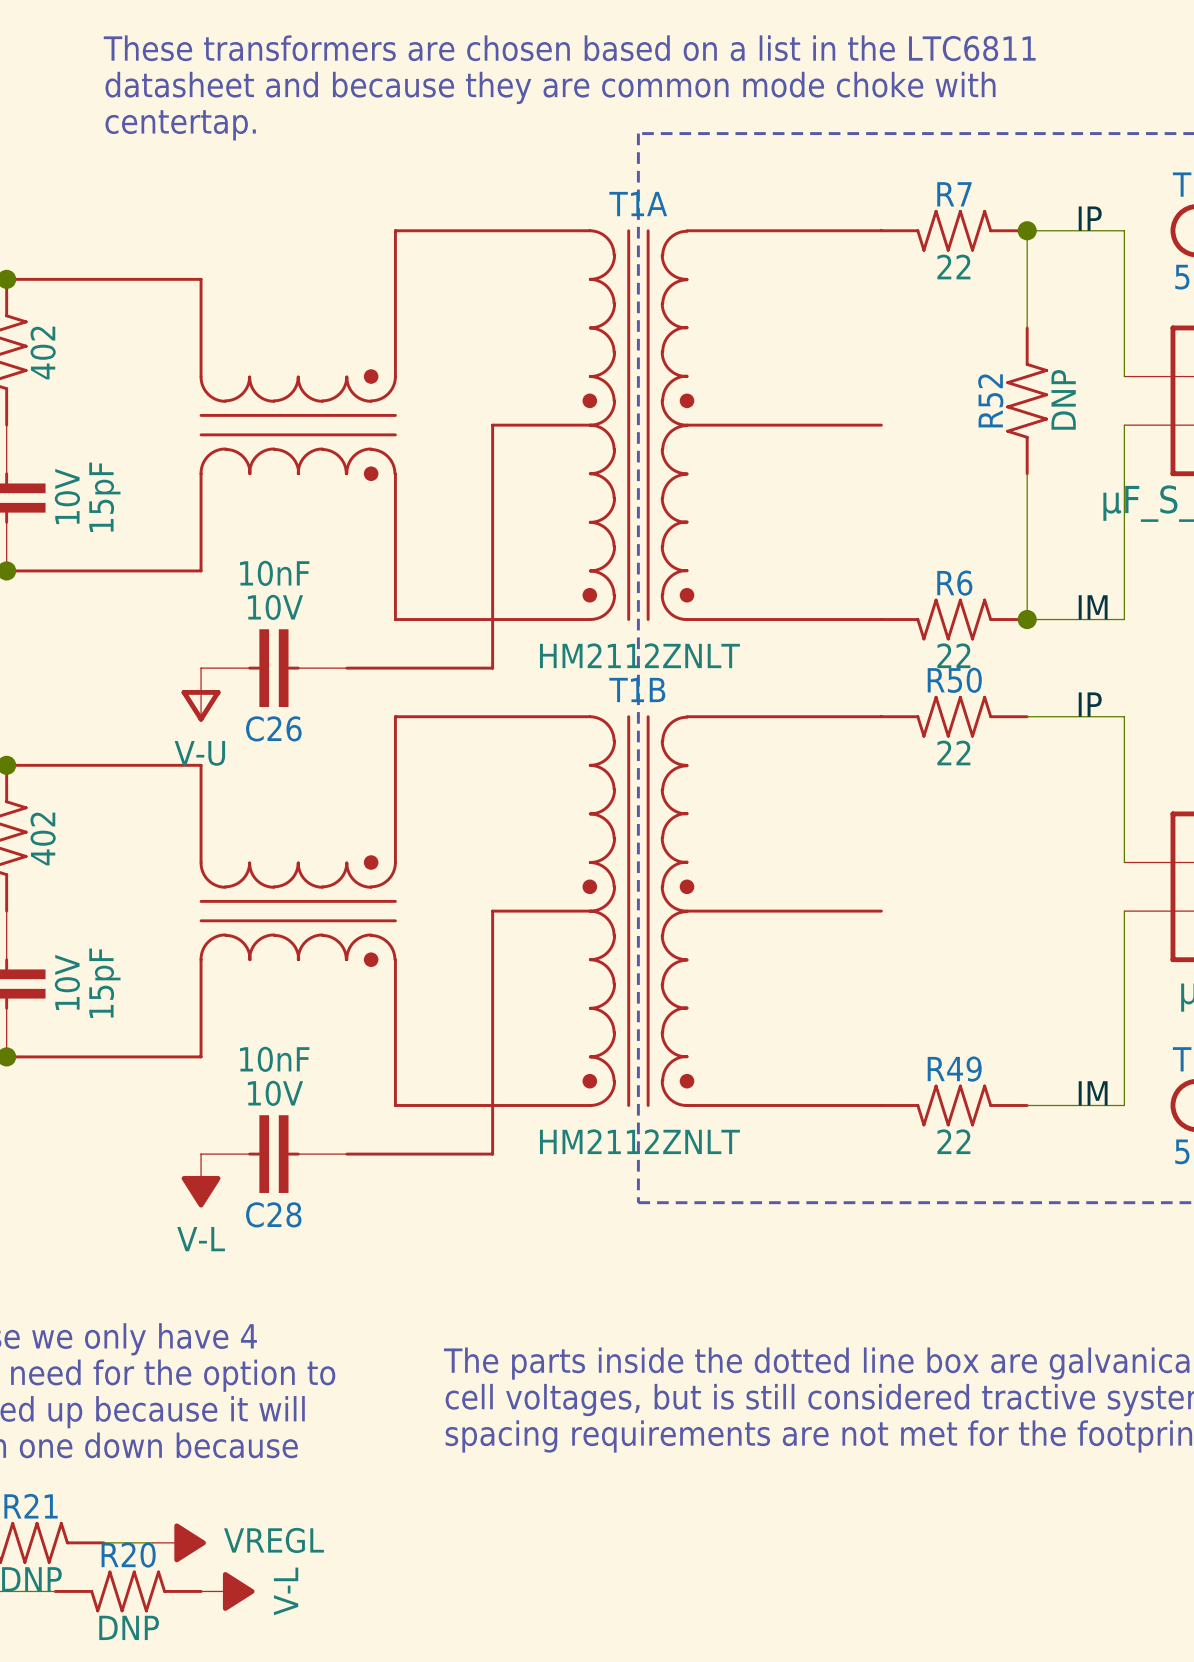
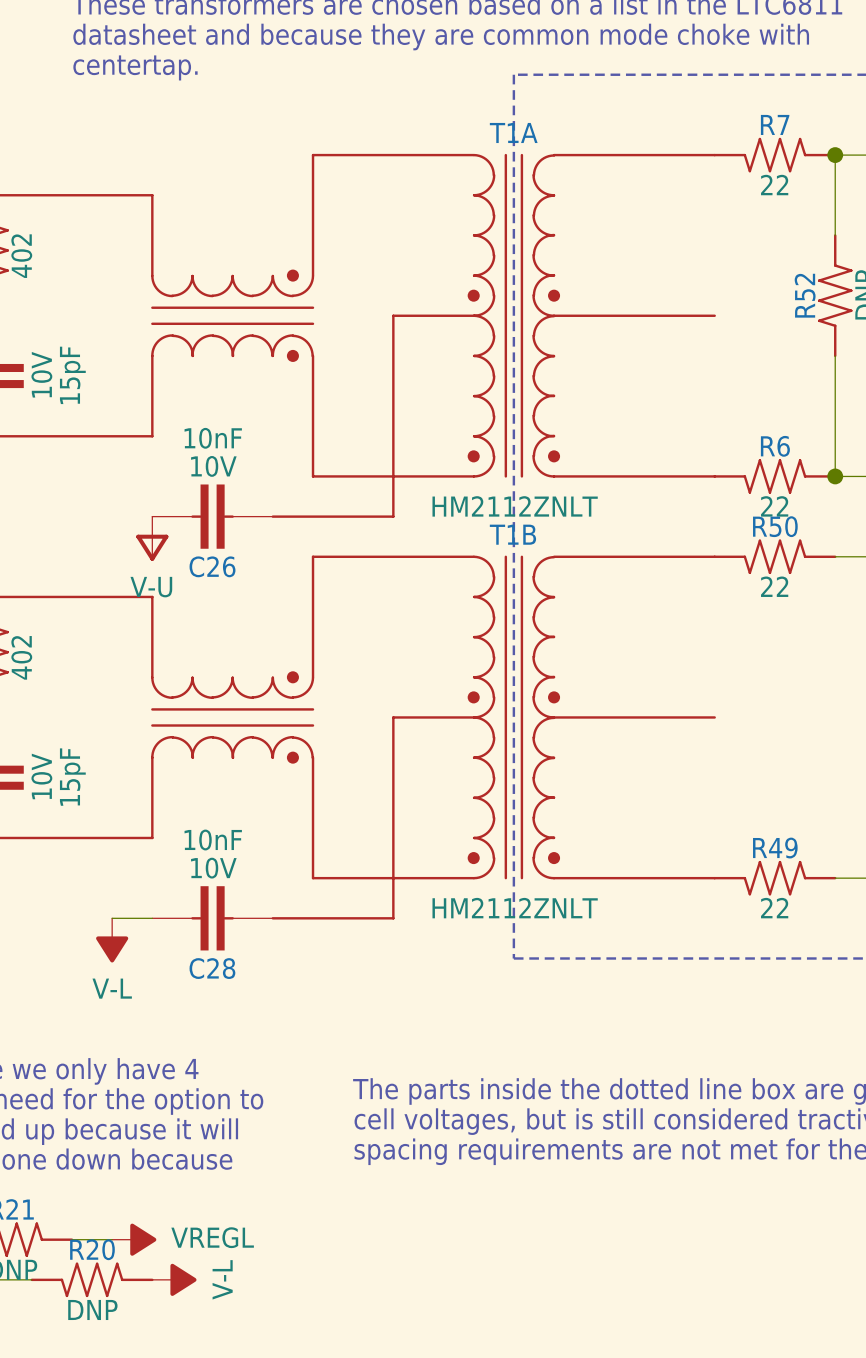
wire: none -> (112, 918) (152, 918)
power symbol position: V-L (201, 1180) -> V-L (112, 940)

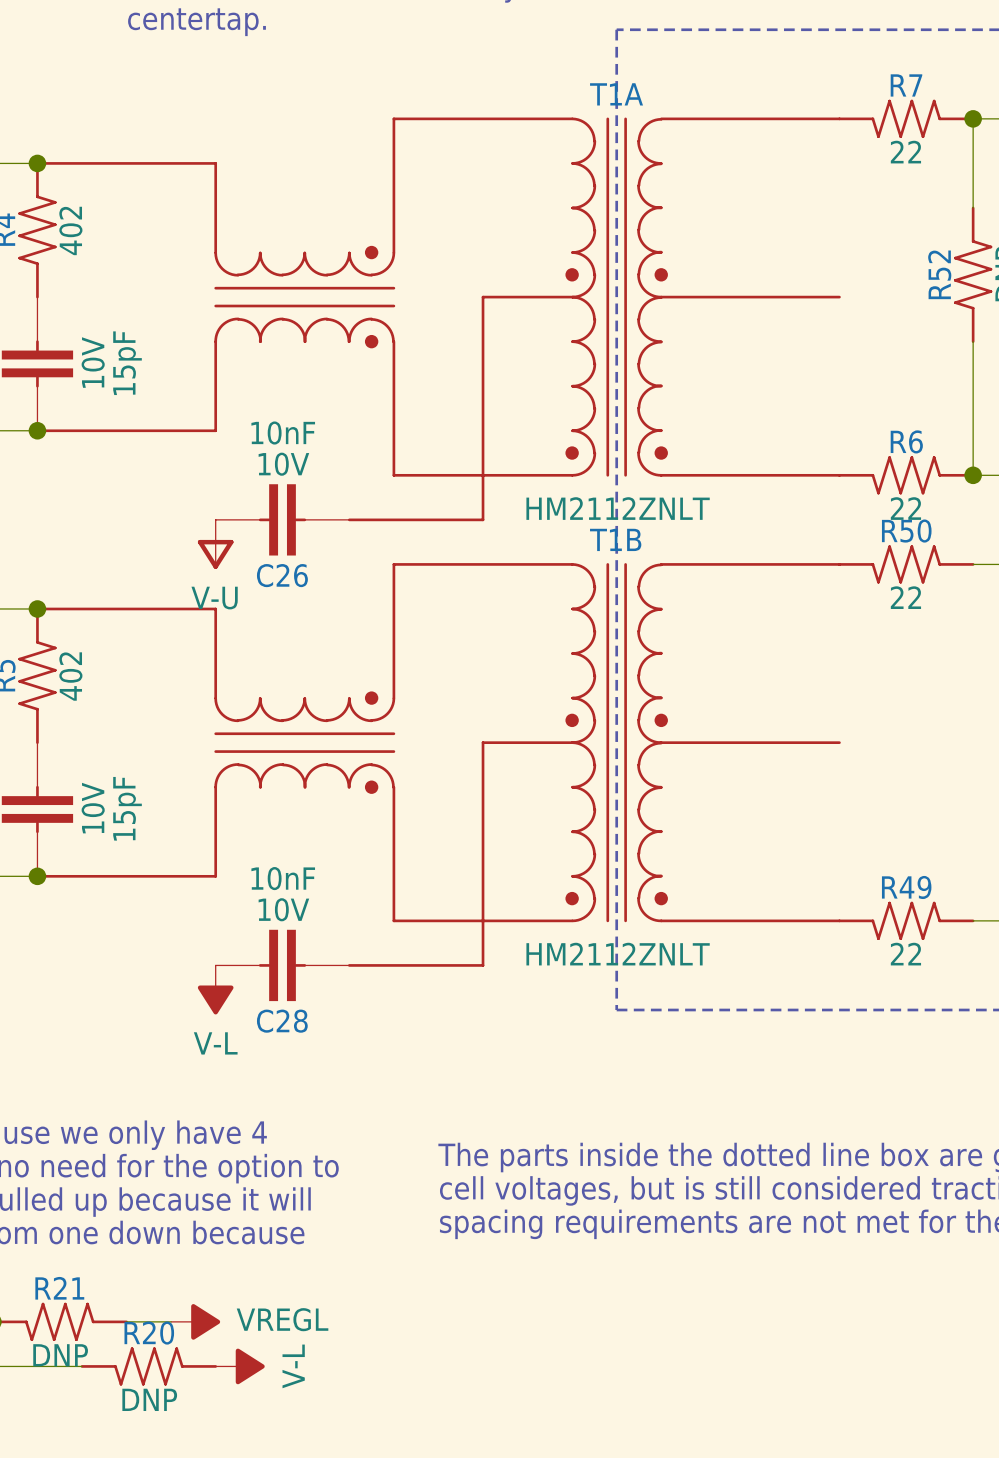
wire: (112, 918) (152, 918) -> none
power symbol position: V-L (112, 940) -> V-L (215, 989)

